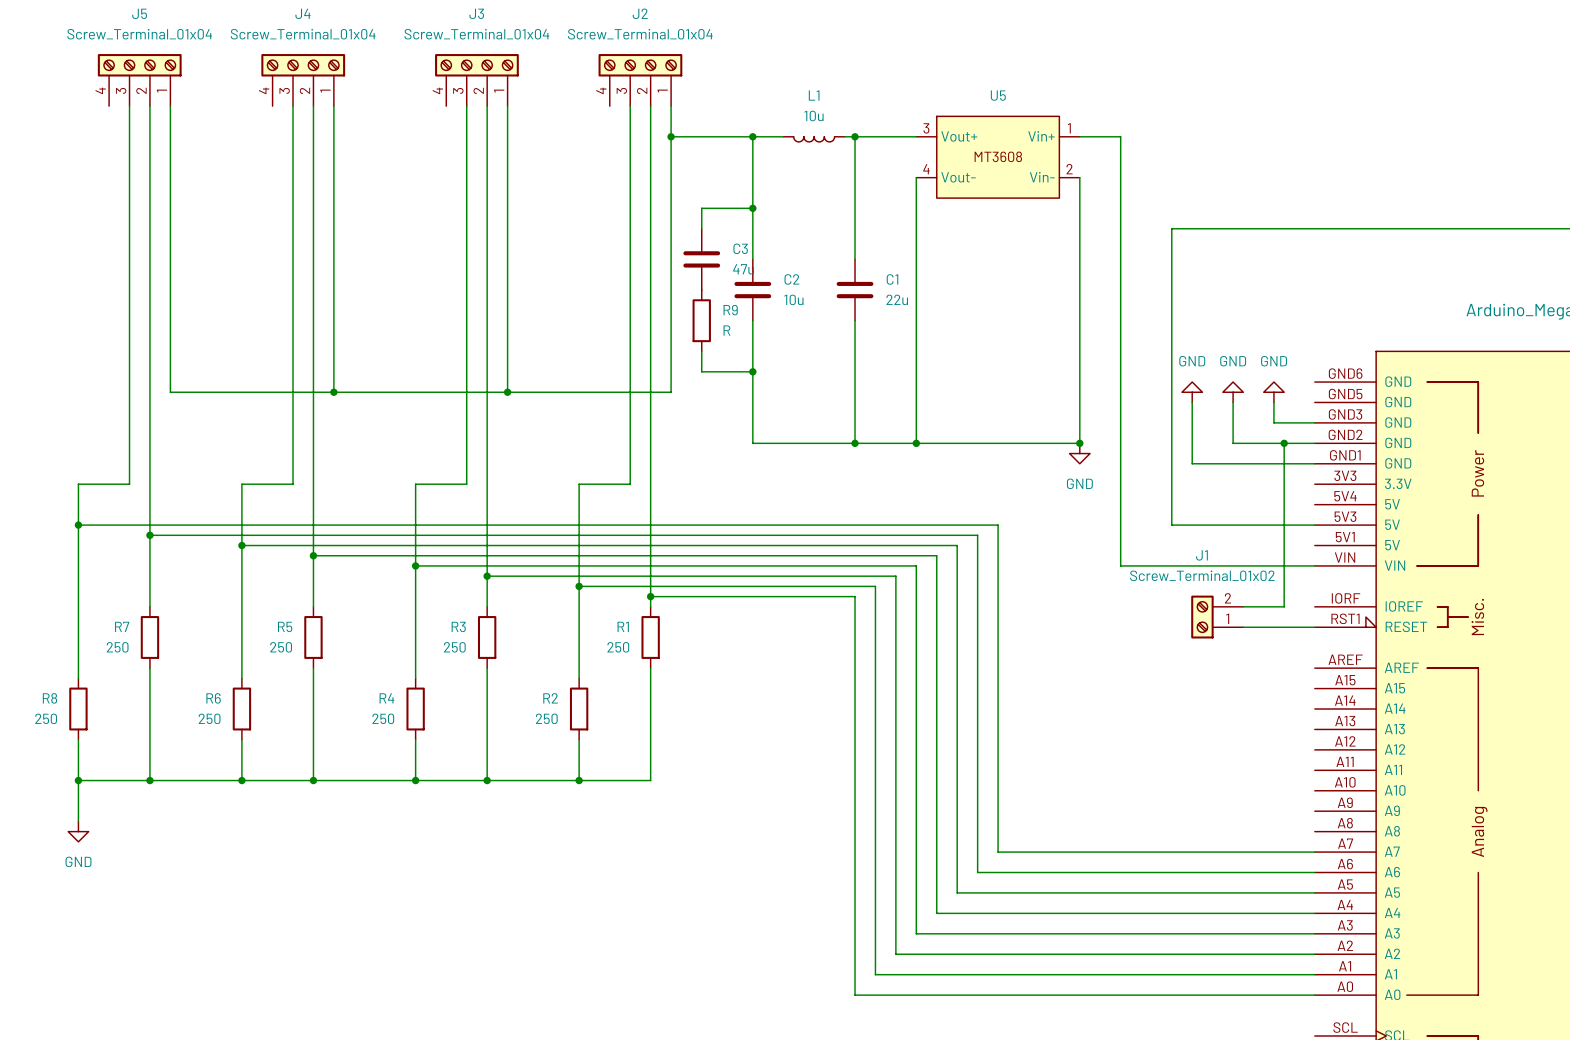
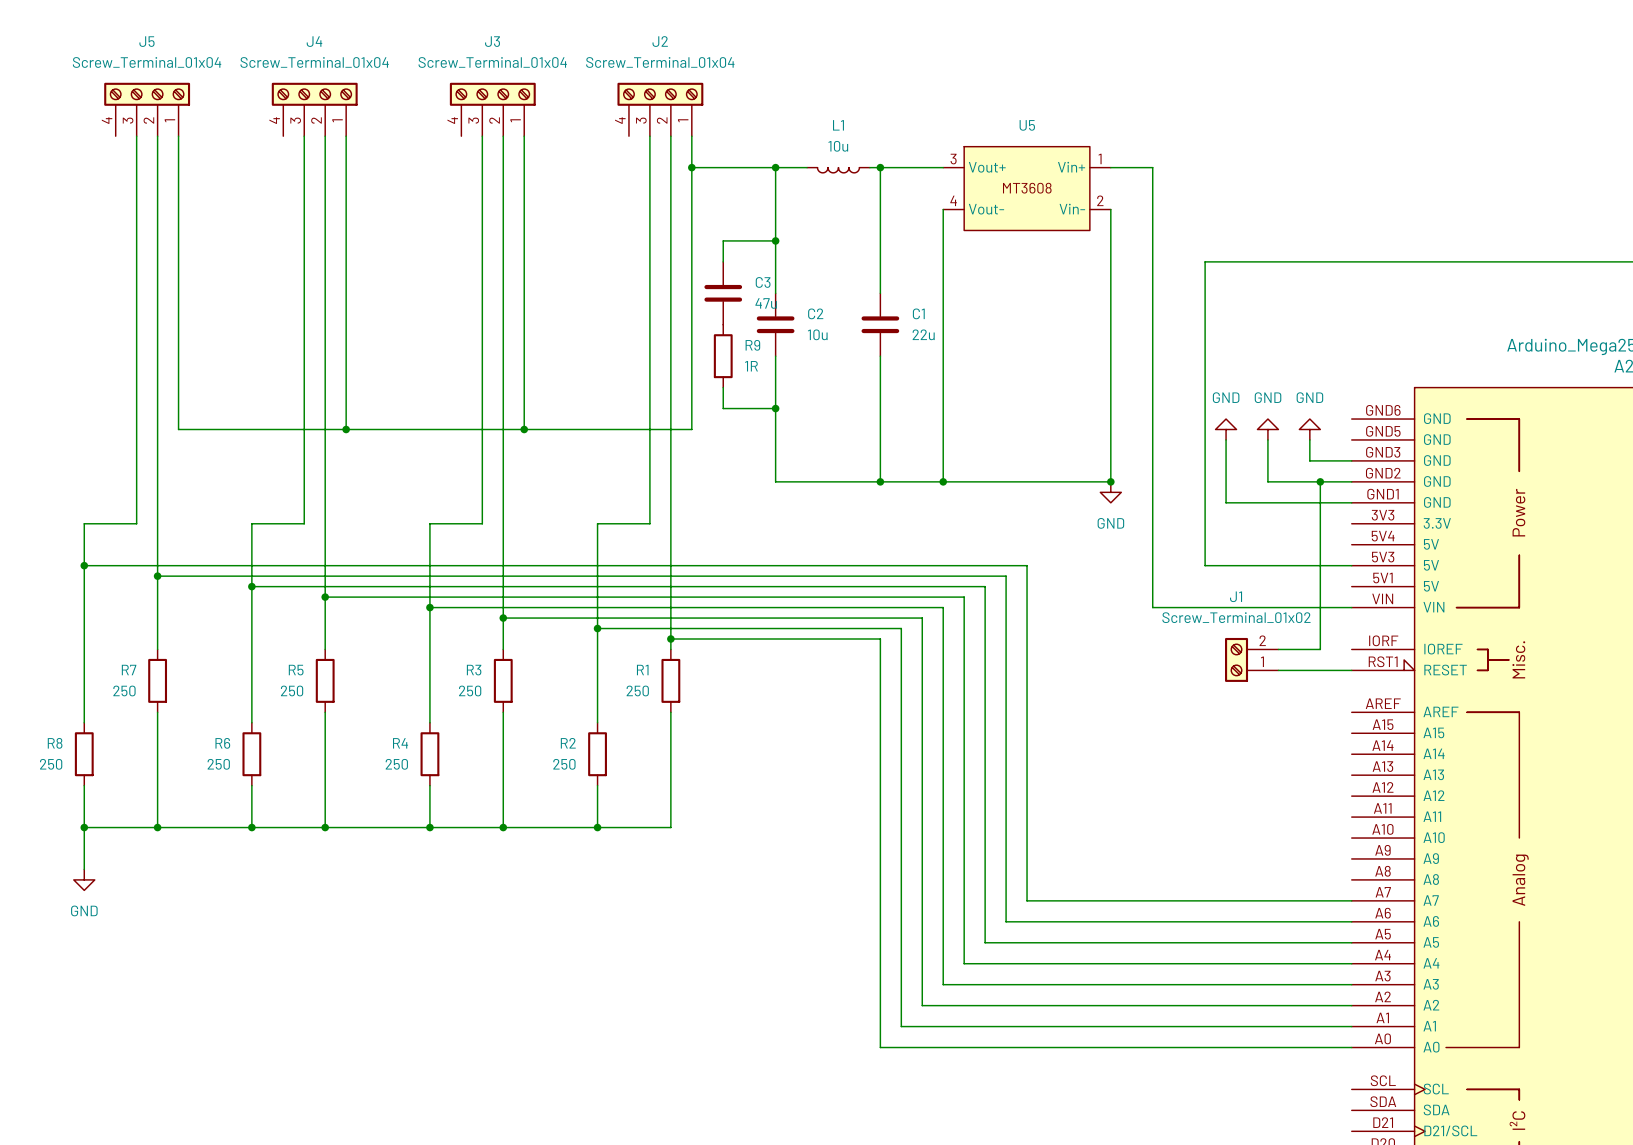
R9 value: R (726, 330) -> 1R (751, 366)

